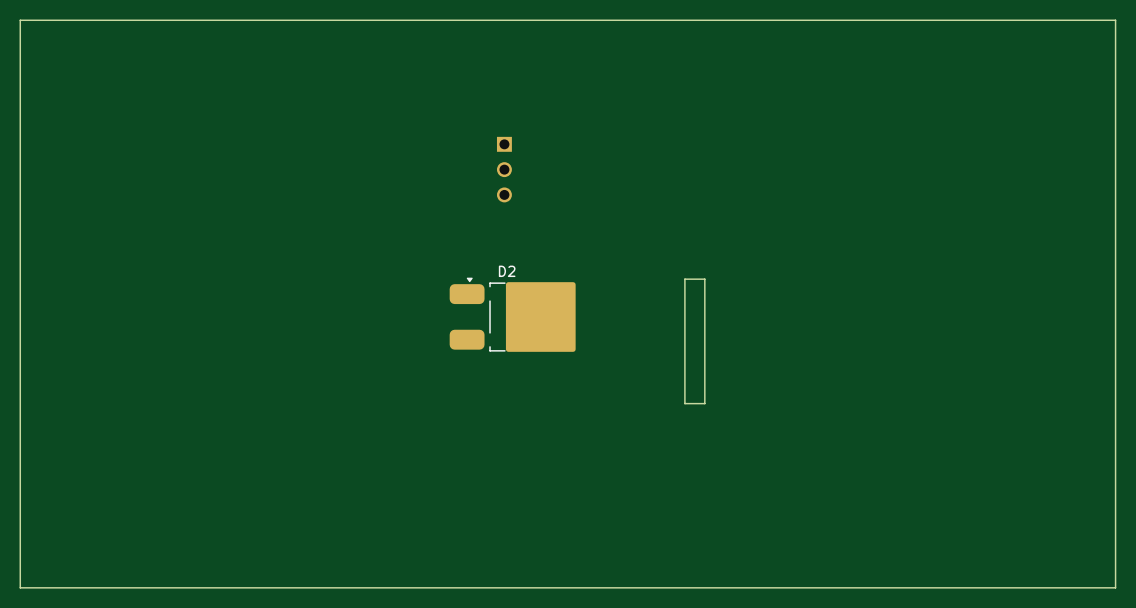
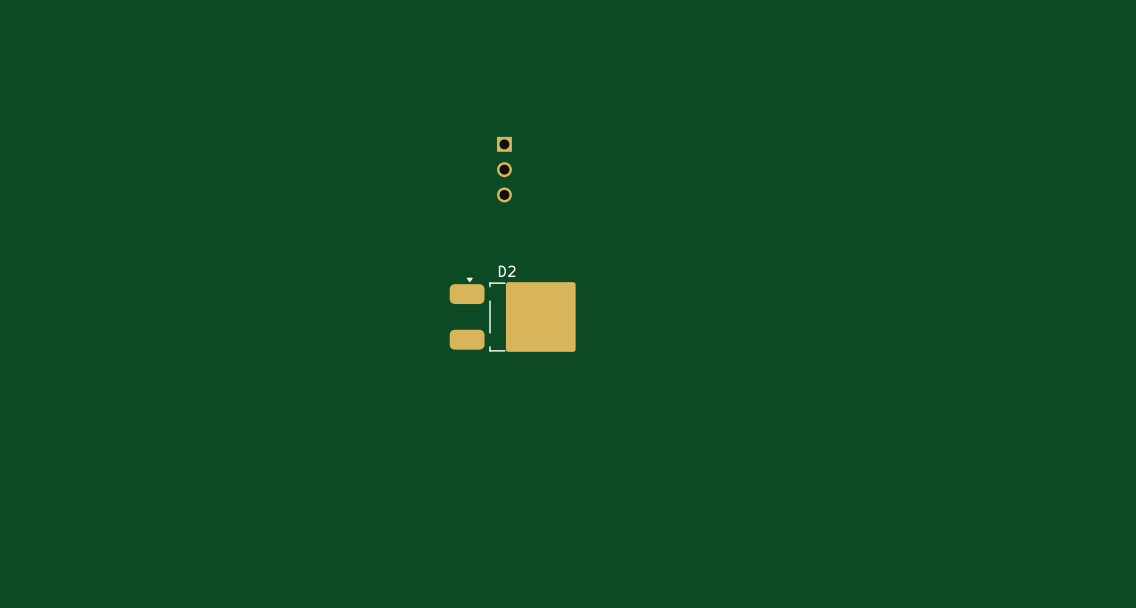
board edge: (1115, 20) (20, 20) (20, 587) (1115, 587) (1115, 20) -> none
board edge: (704, 279) (684, 279) (684, 403) (704, 403) (704, 279) -> none

